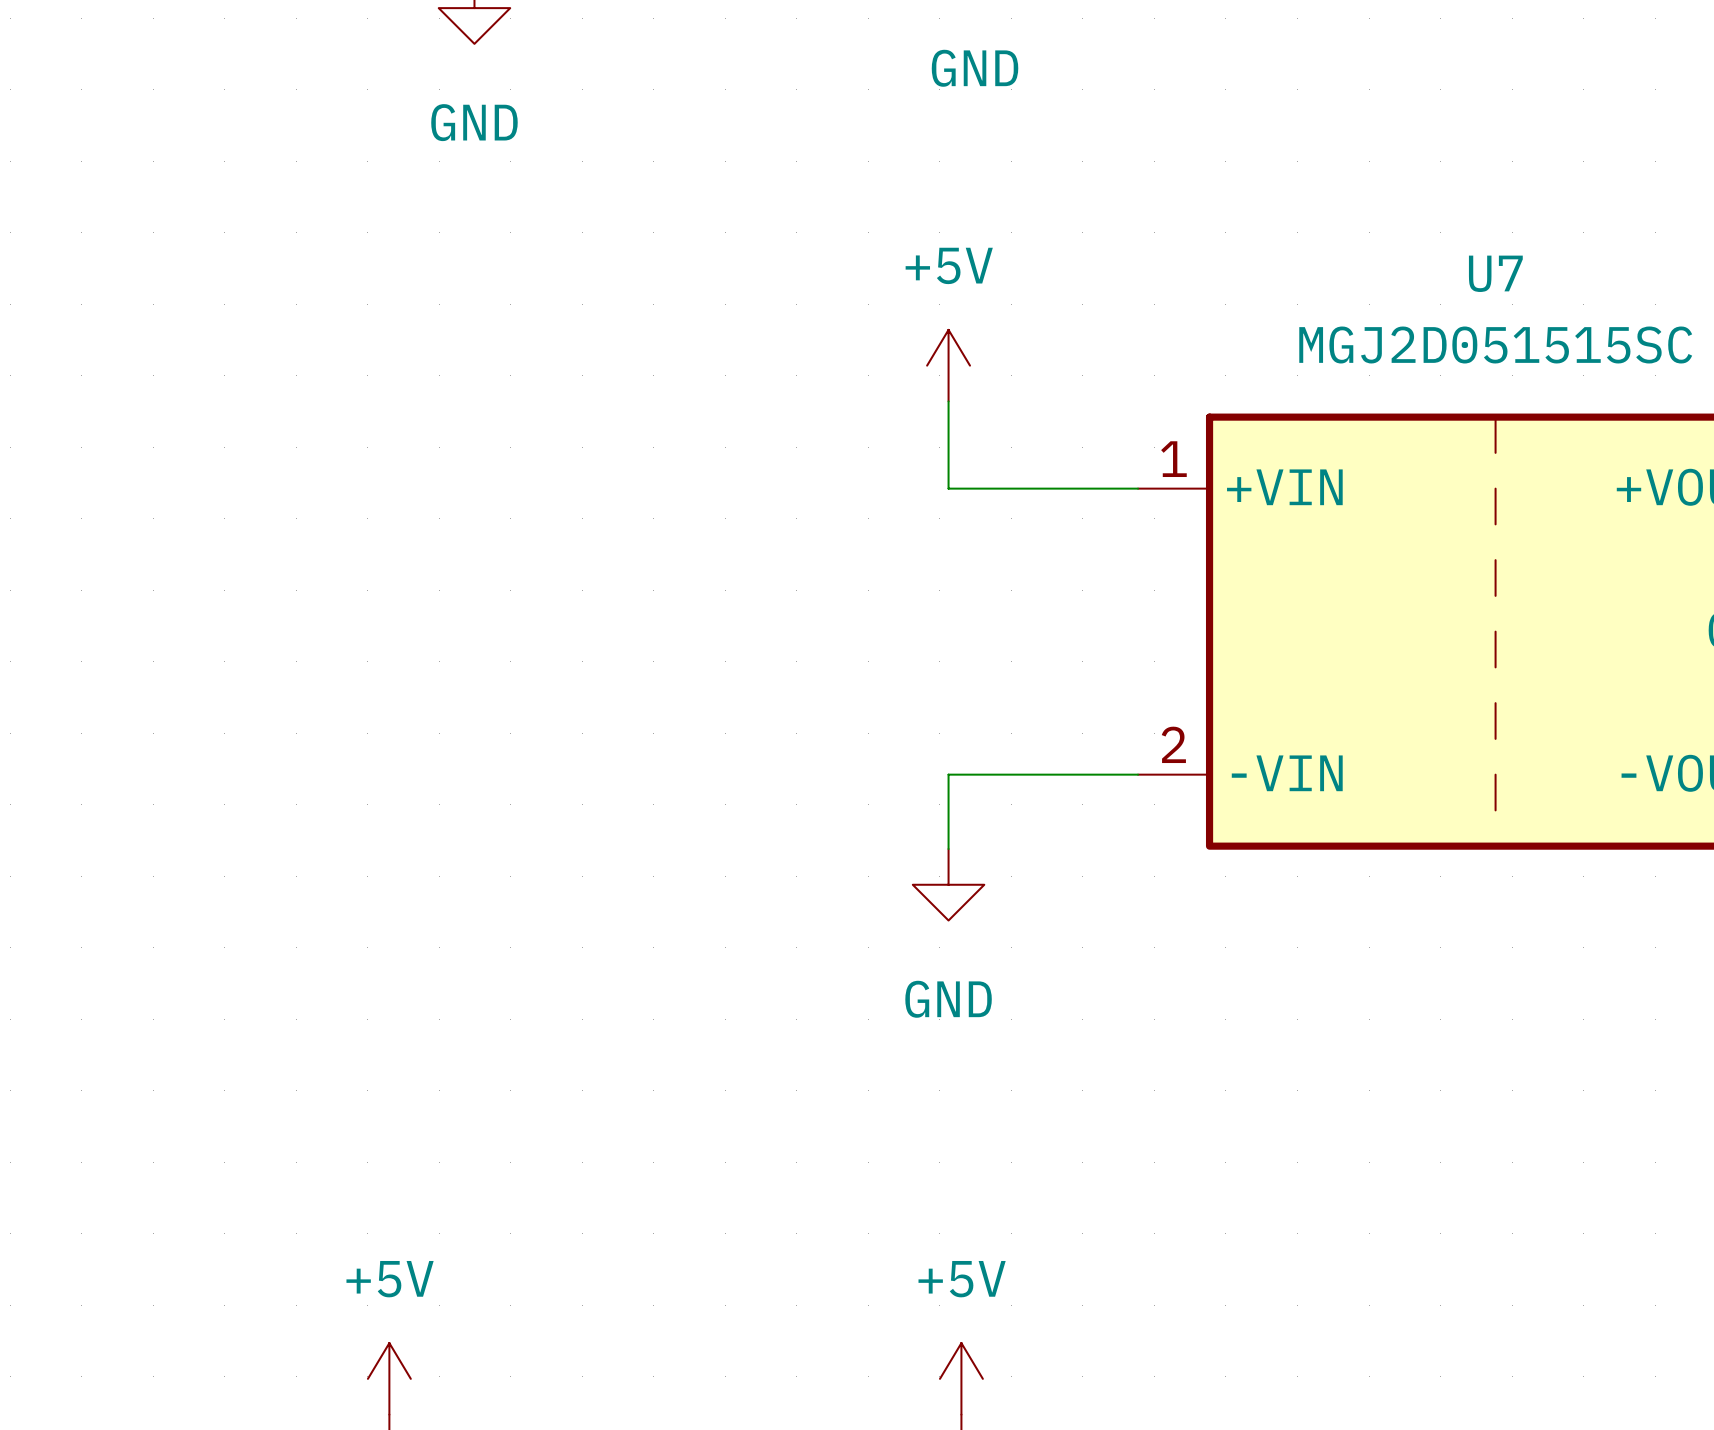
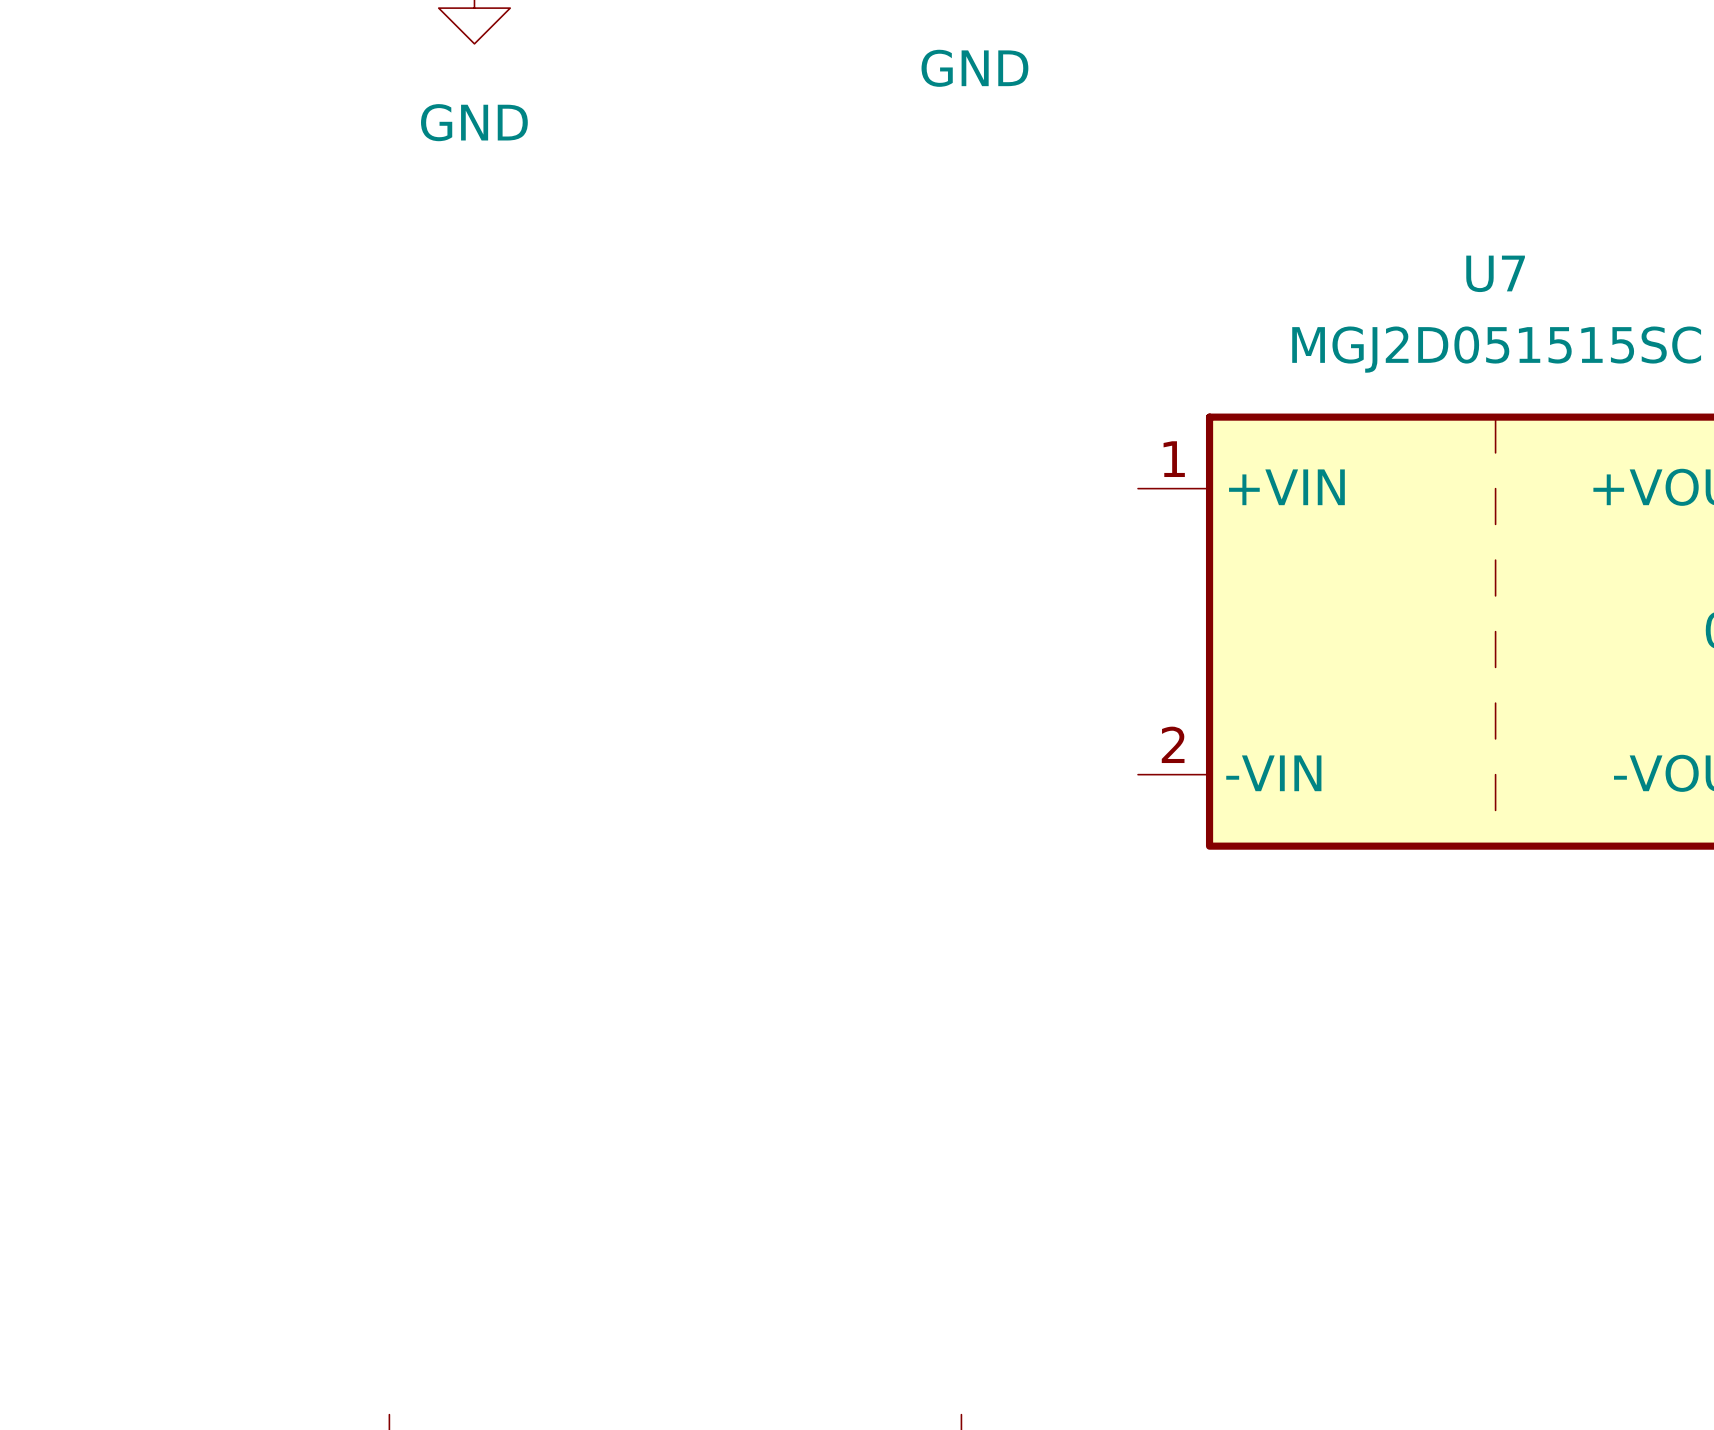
power symbol: +5V (948, 365) -> none
wire: (948, 401) (948, 488) (1138, 488) -> none
wire: (1138, 774) (948, 774) (948, 849) -> none
power symbol: GND (948, 884) -> none
power symbol: +5V (389, 1378) -> none
power symbol: +5V (961, 1378) -> none

